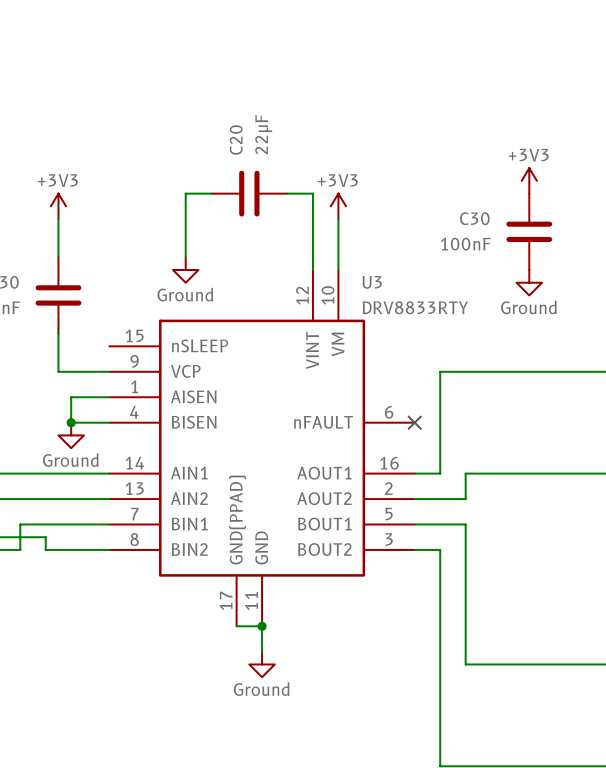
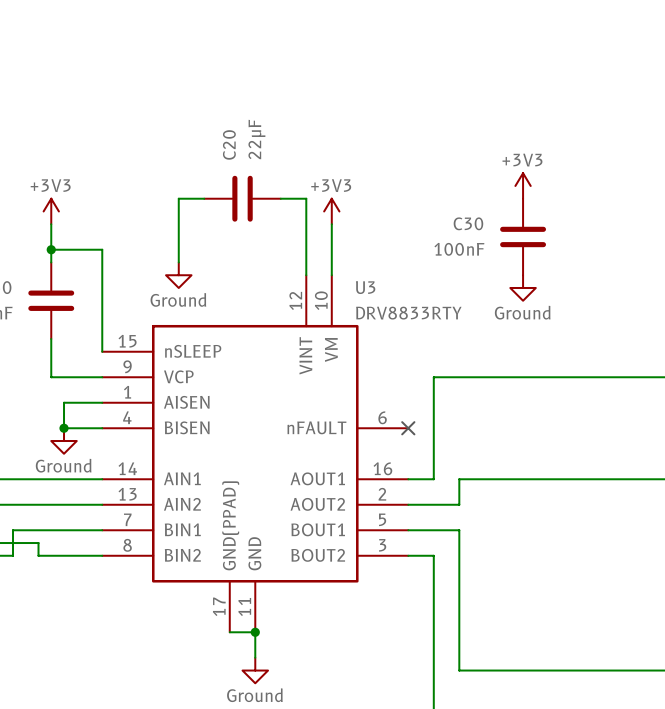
wire: none -> (51, 249) (102, 249) (102, 351)
junction: none -> (51, 249)

